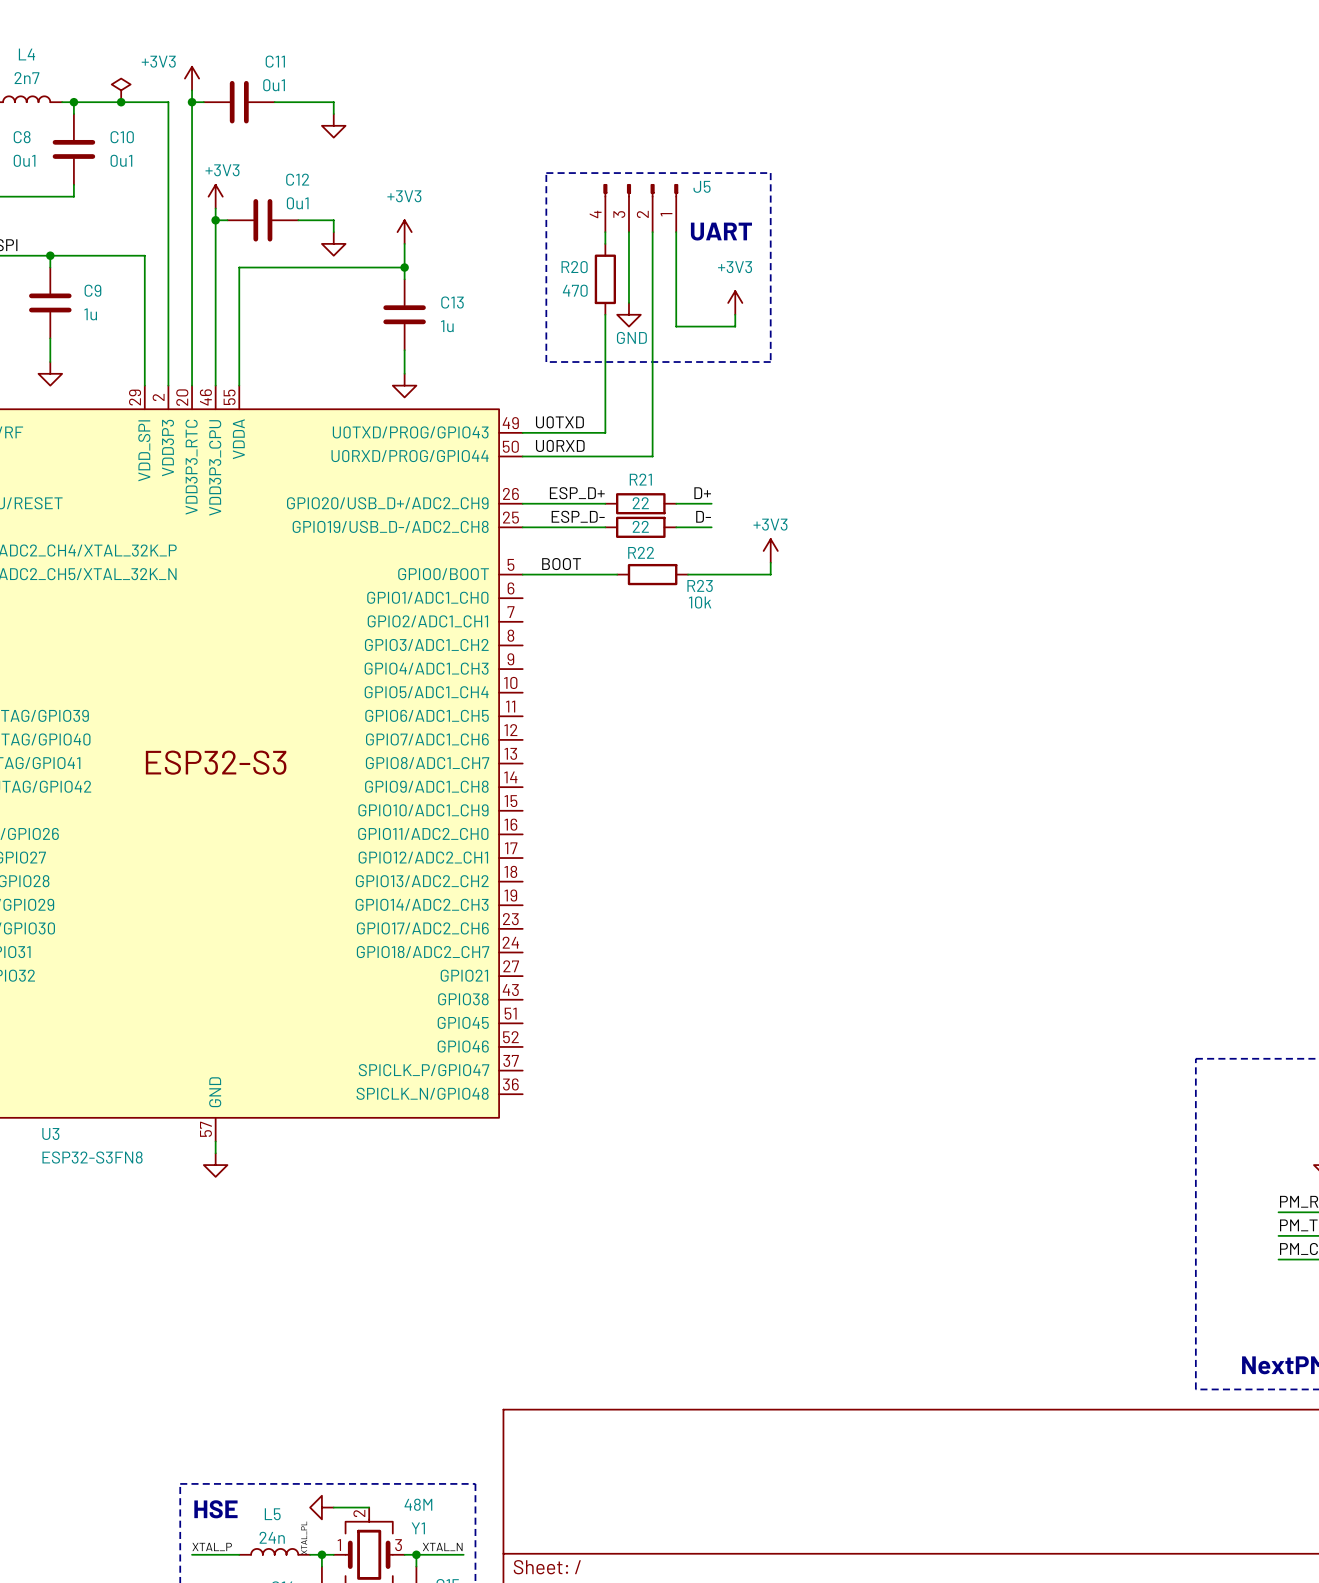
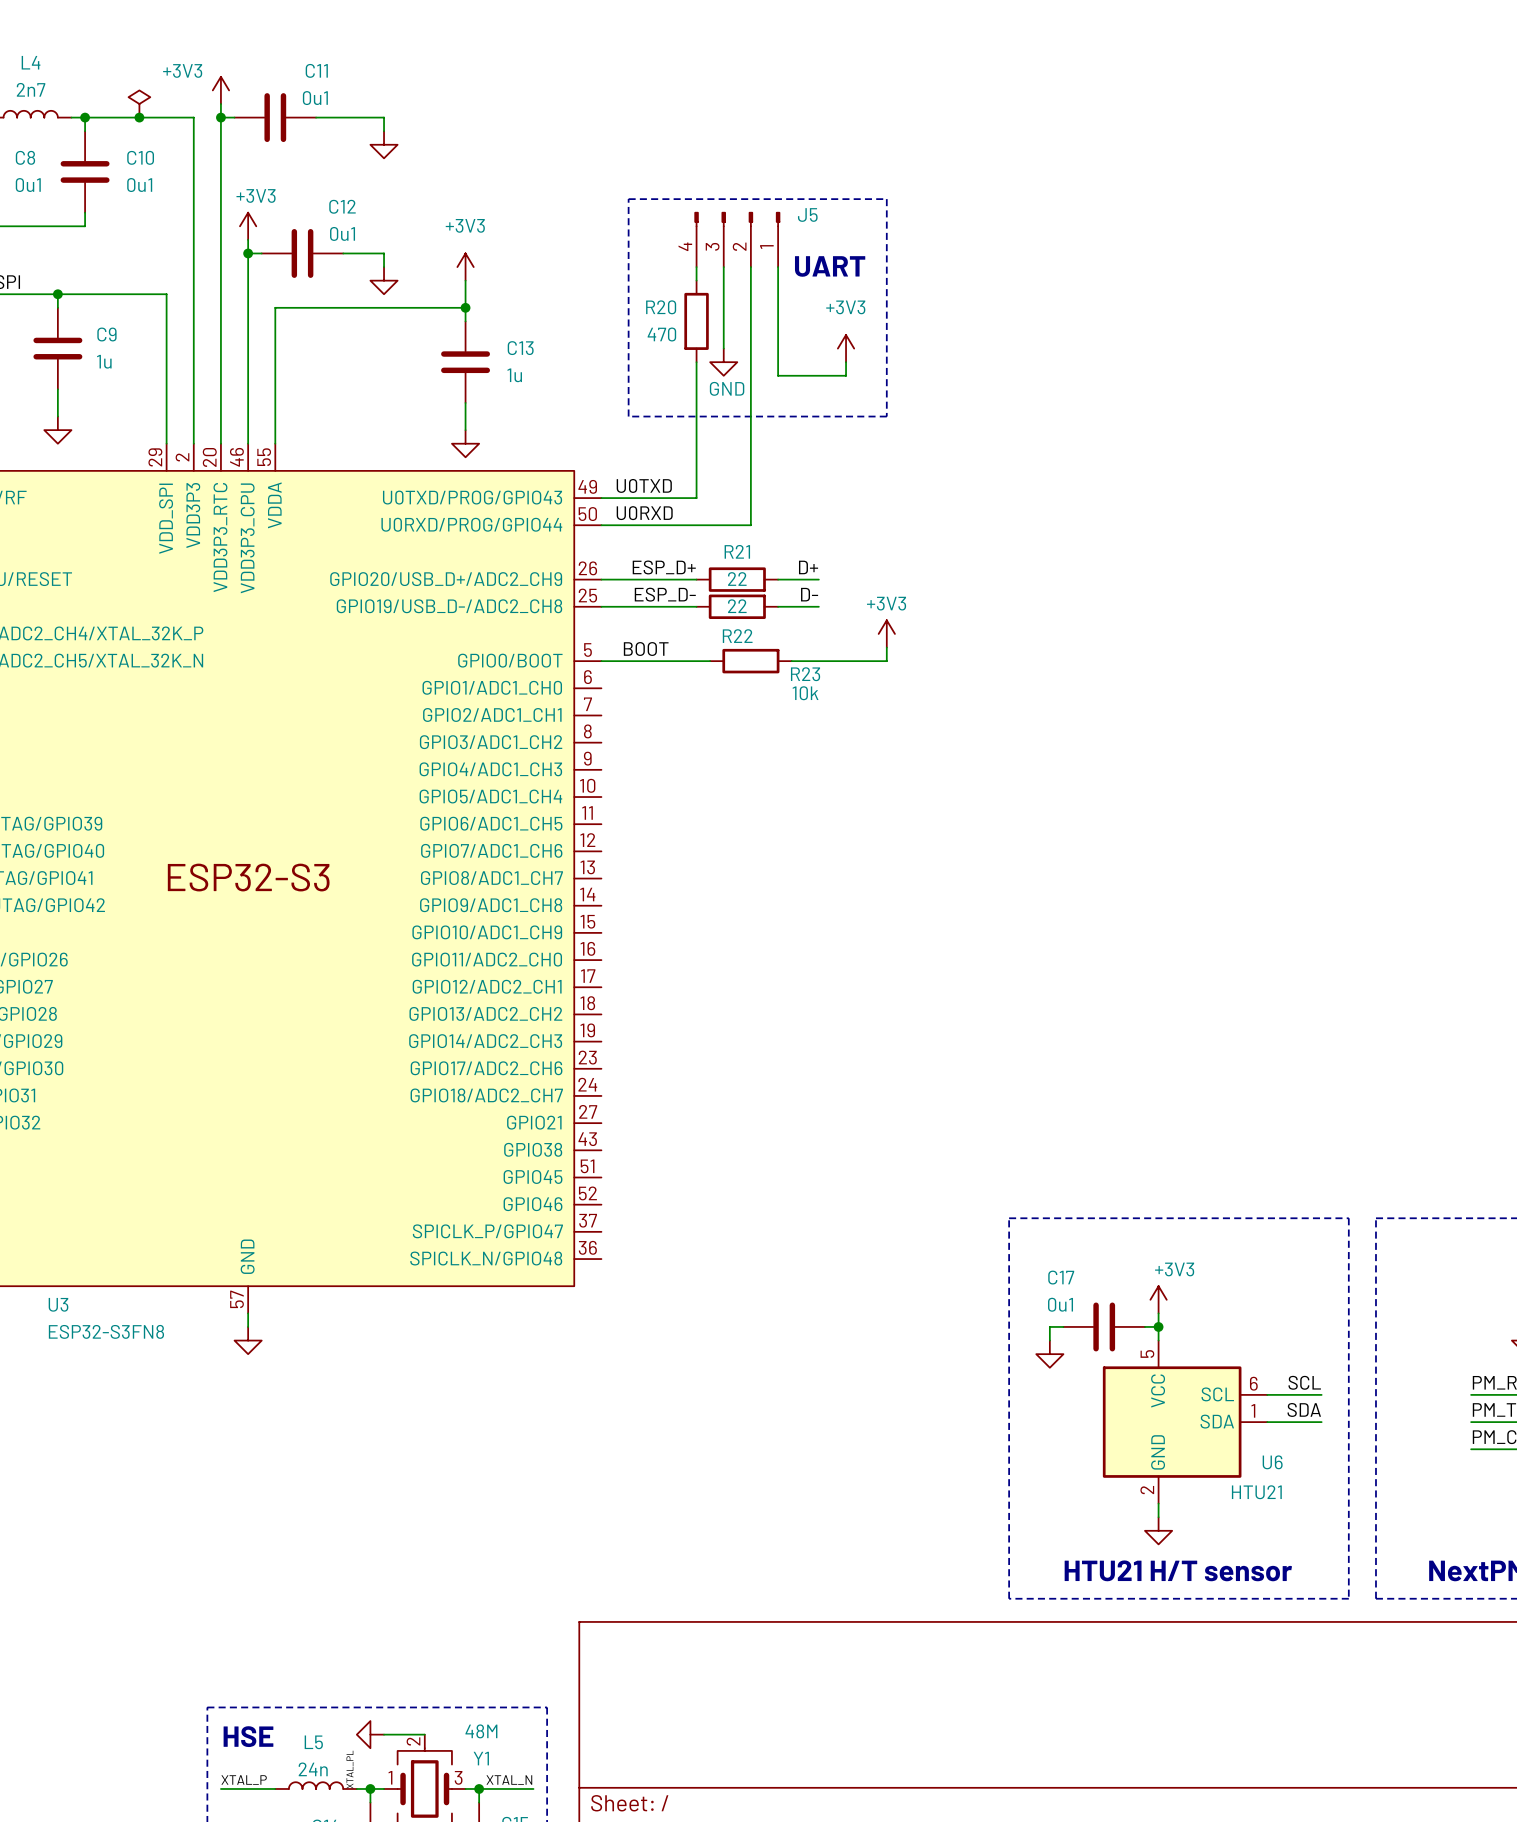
line: none -> (1009, 1218) (1348, 1218) (1348, 1598) (1009, 1598) (1009, 1218)
power symbol: none -> +3V3 (1158, 1299)
wire: none -> (1158, 1313) (1158, 1340)
wire: none -> (1063, 1326) (1049, 1326) (1049, 1340)
C17: none -> 0u1 (1104, 1326)
wire: none -> (1144, 1326) (1158, 1326)
junction: none -> (1158, 1326)
power symbol: none -> (1049, 1354)
label: none -> SCL (1304, 1382)
wire: none -> (1267, 1394) (1321, 1394)
label: none -> SDA (1304, 1409)
U6: none -> HTU21 (1185, 1422)
wire: none -> (1267, 1422) (1321, 1422)
wire: none -> (1158, 1503) (1158, 1517)
power symbol: none -> (1158, 1530)
text: none -> HTU21 H/T sensor (1178, 1570)

